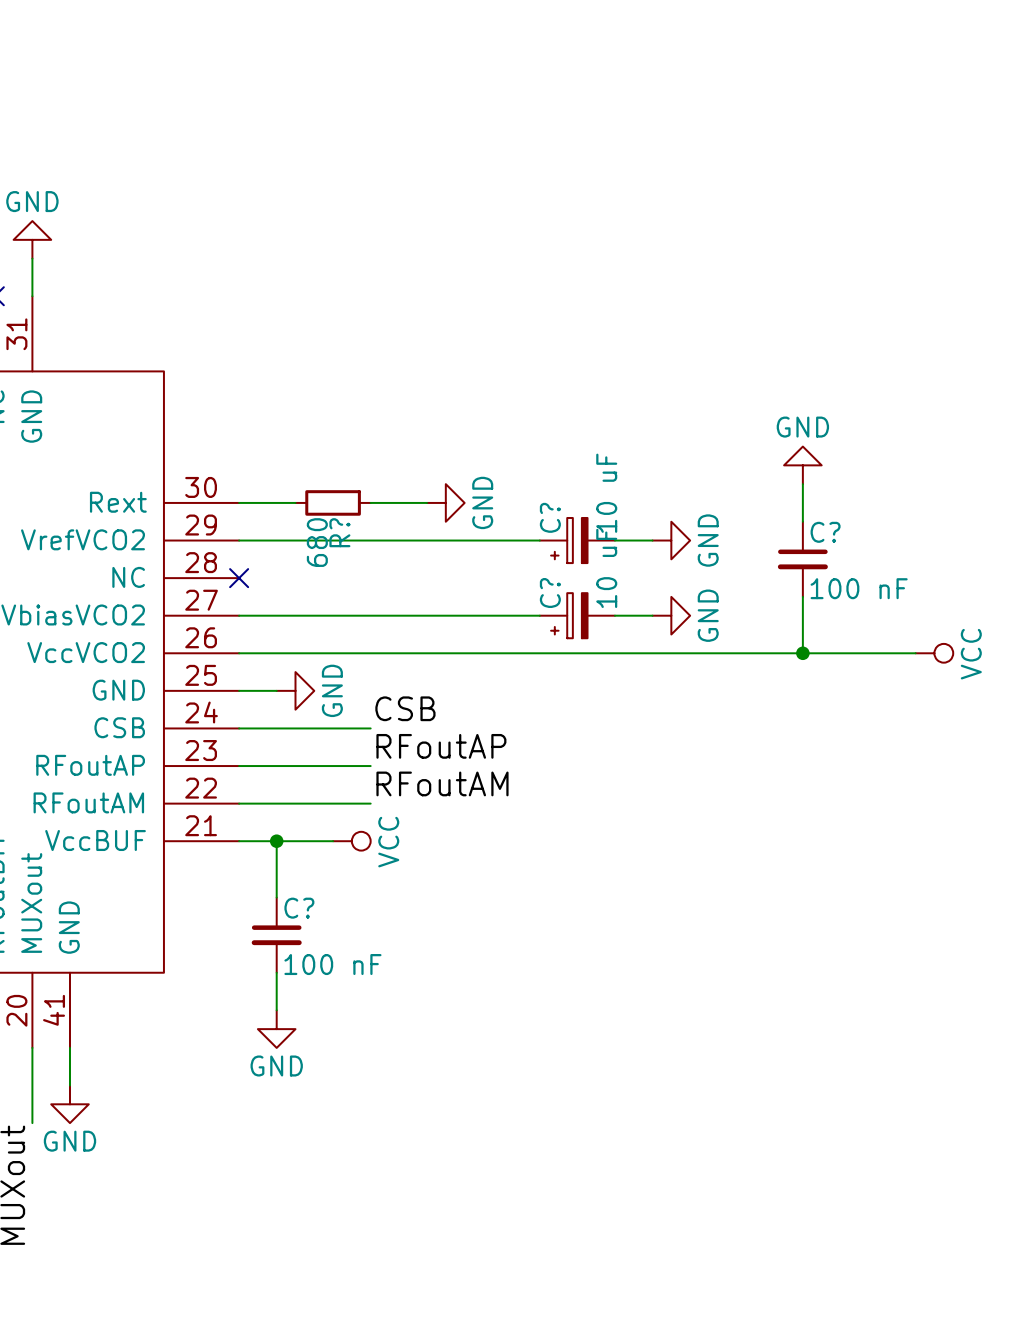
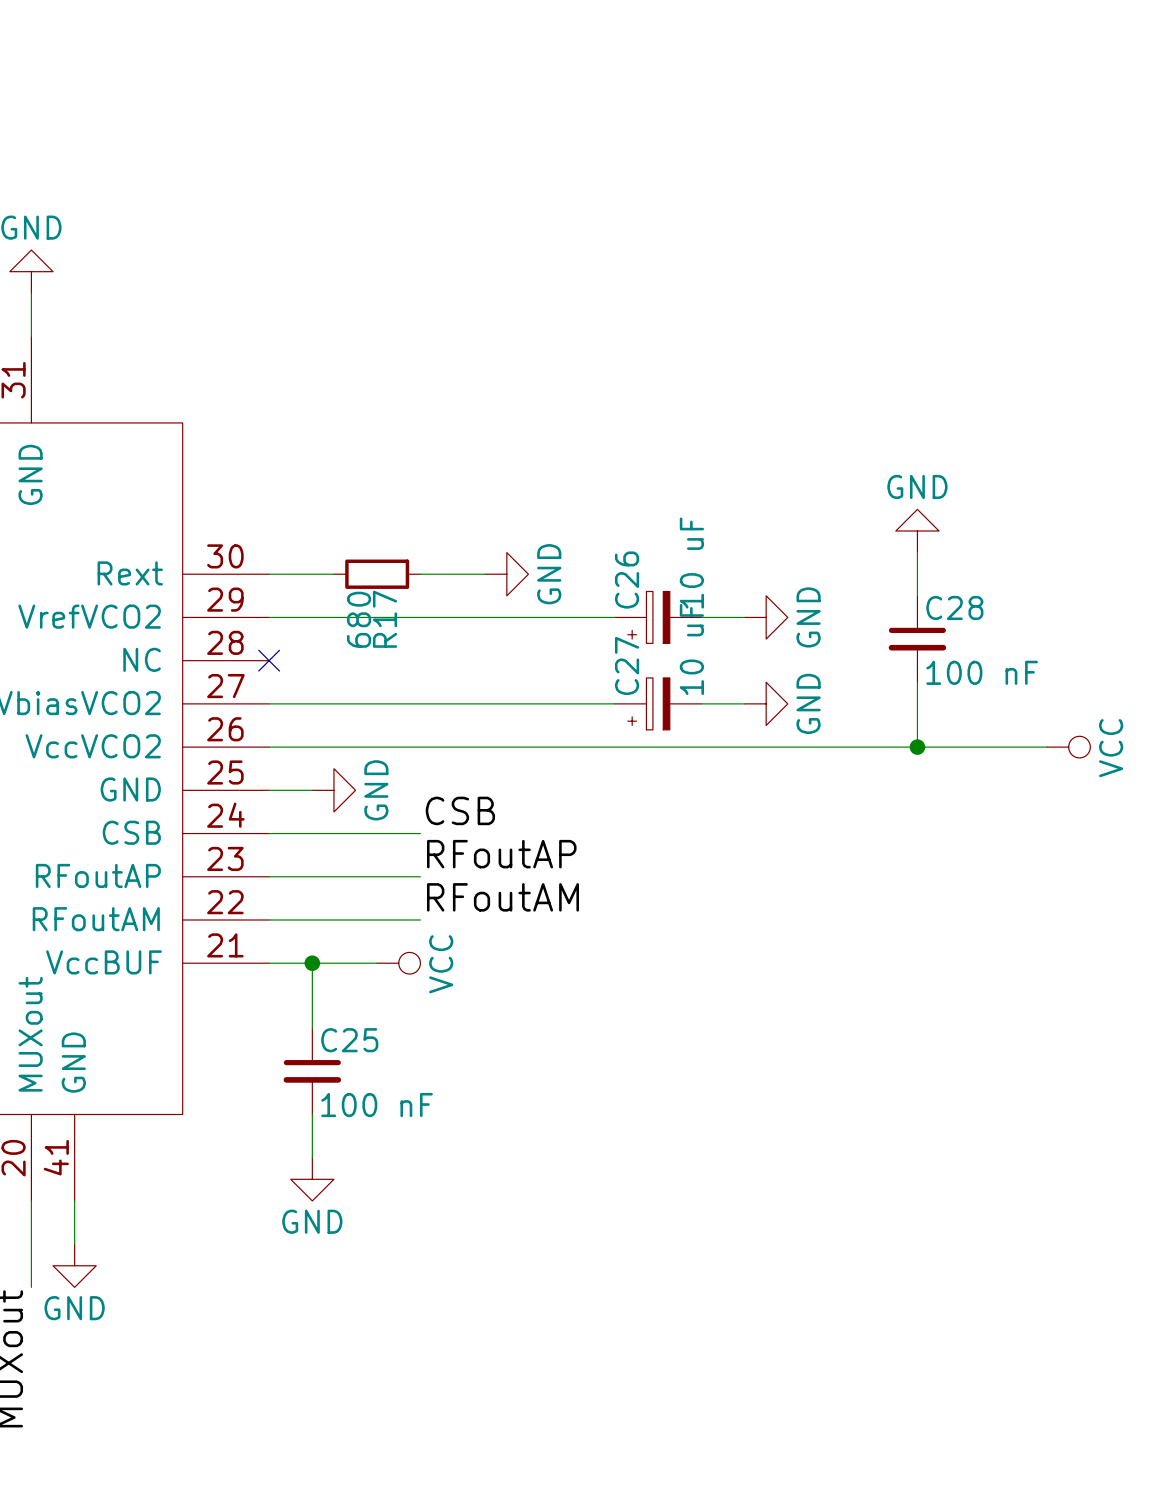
C? name: C? (550, 517) -> C26 (627, 580)
R? name: R? (339, 532) -> R17 (385, 619)
C? name: C? (825, 532) -> C28 (954, 607)
C? name: C? (550, 593) -> C27 (627, 665)
C? name: C? (299, 908) -> C25 (349, 1040)

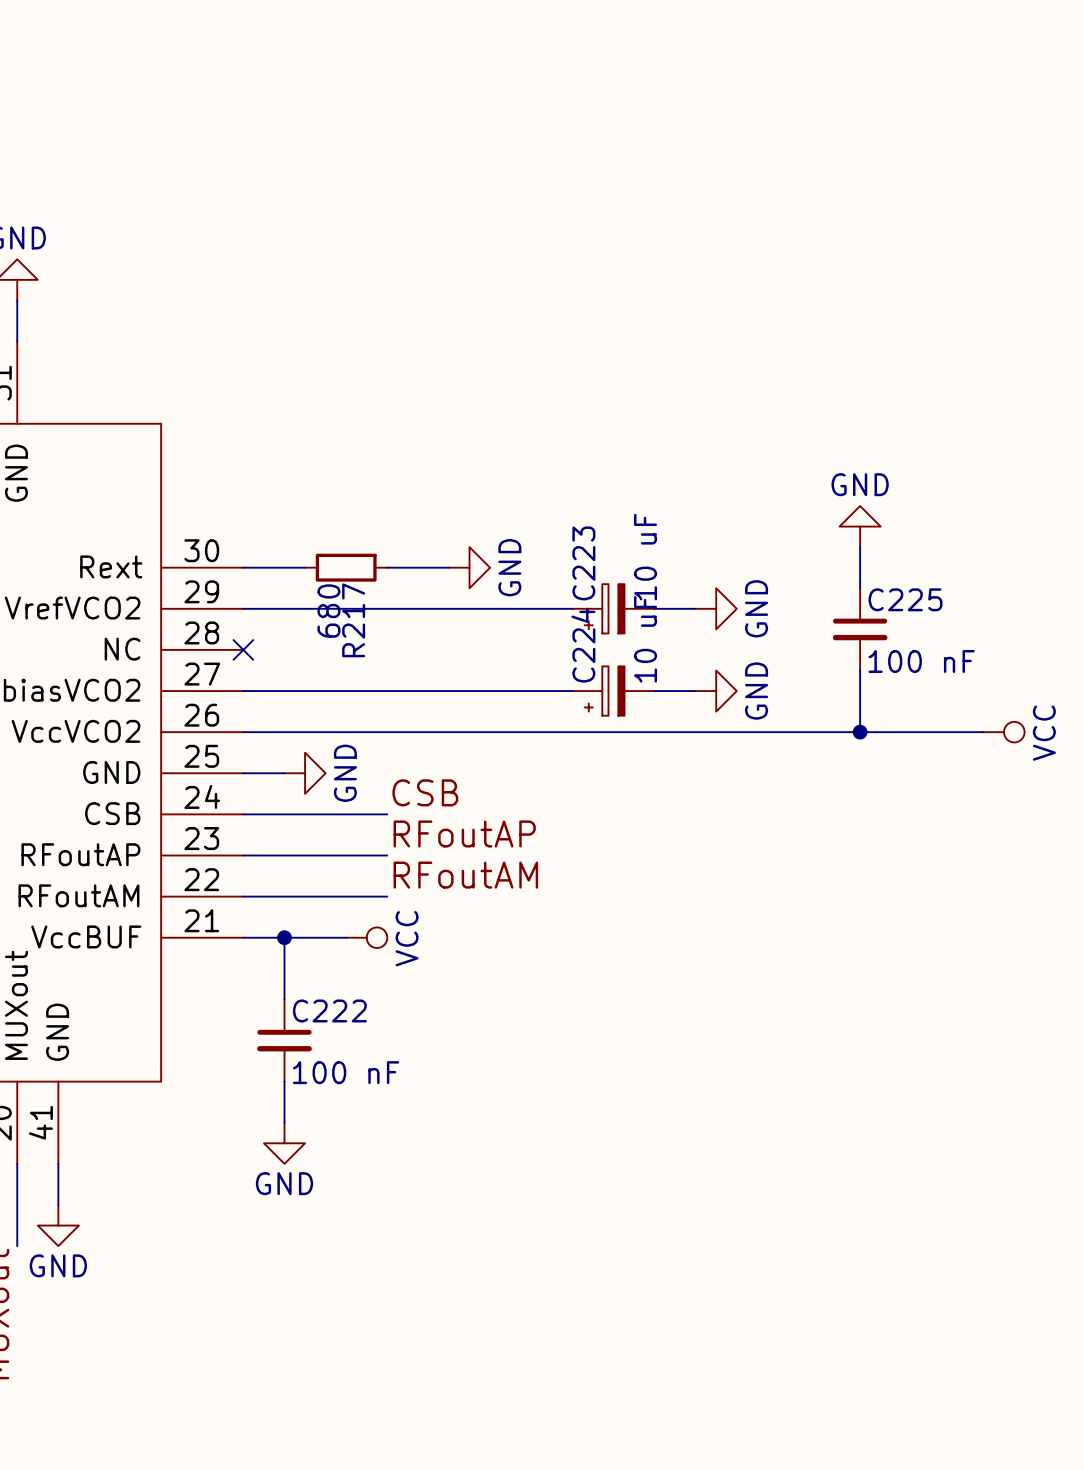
C26 name: C26 (627, 580) -> C223 (583, 563)
C28 name: C28 (954, 607) -> C225 (905, 599)
R17 name: R17 (385, 619) -> R217 (353, 620)
C27 name: C27 (627, 665) -> C224 (583, 645)
C25 name: C25 (349, 1040) -> C222 (329, 1010)

